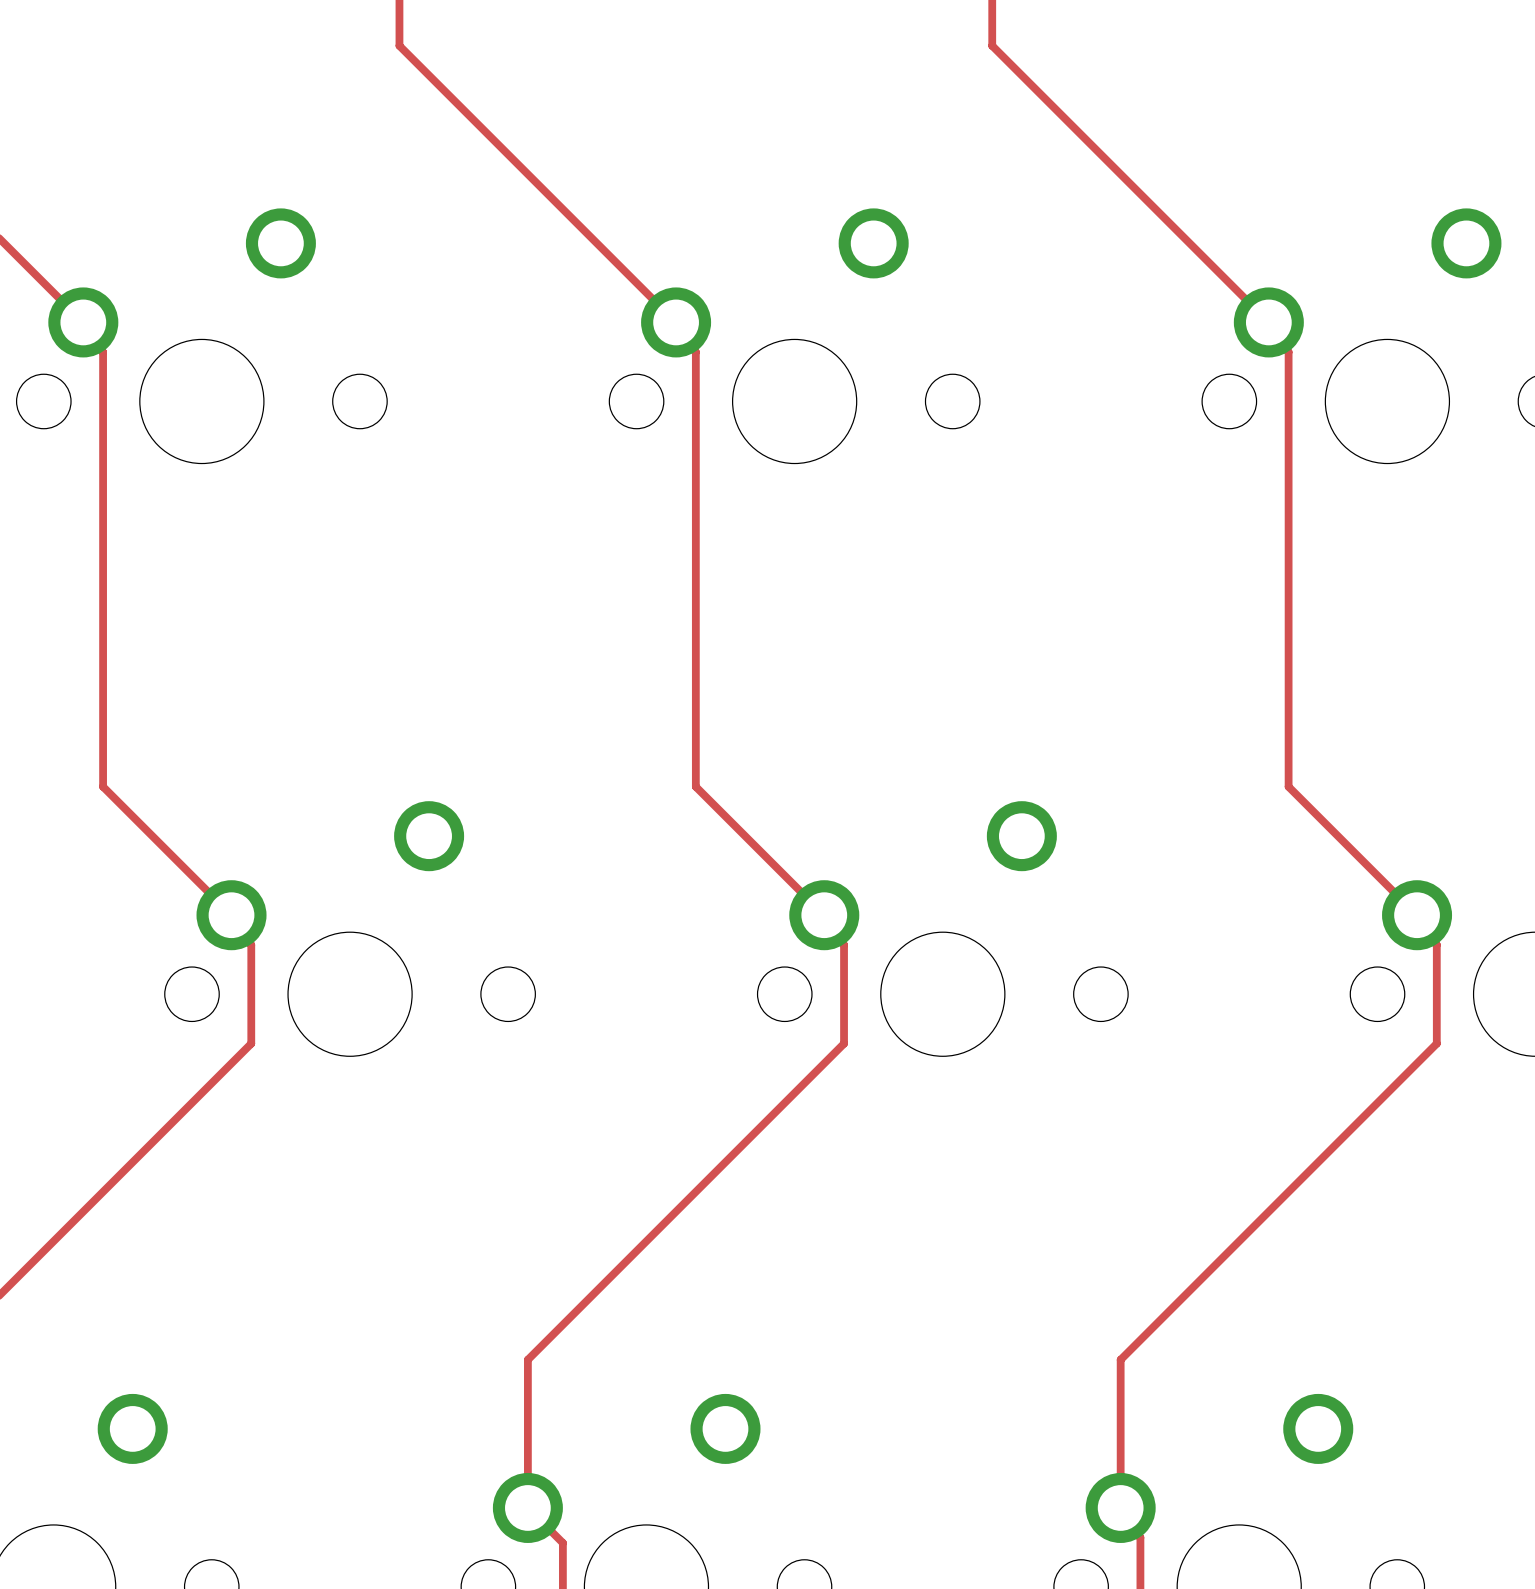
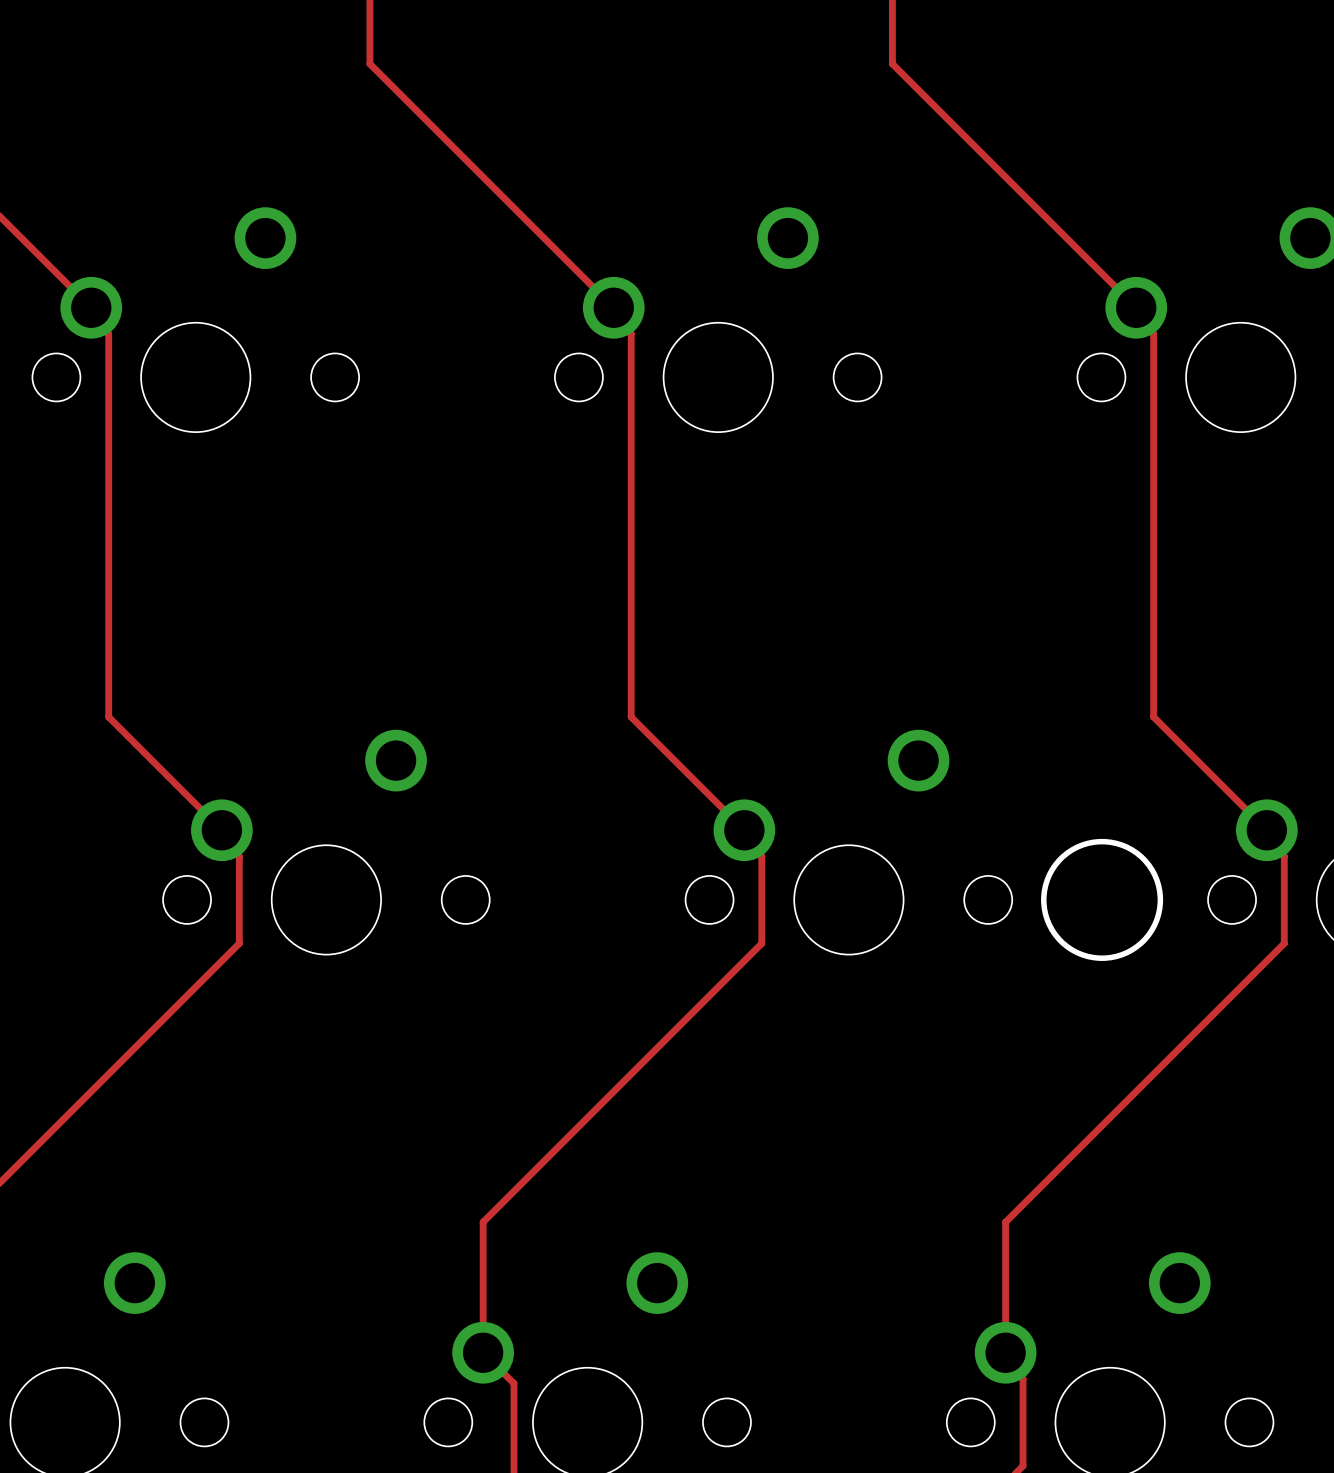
round board edge: none -> [1041, 838, 1164, 961]

